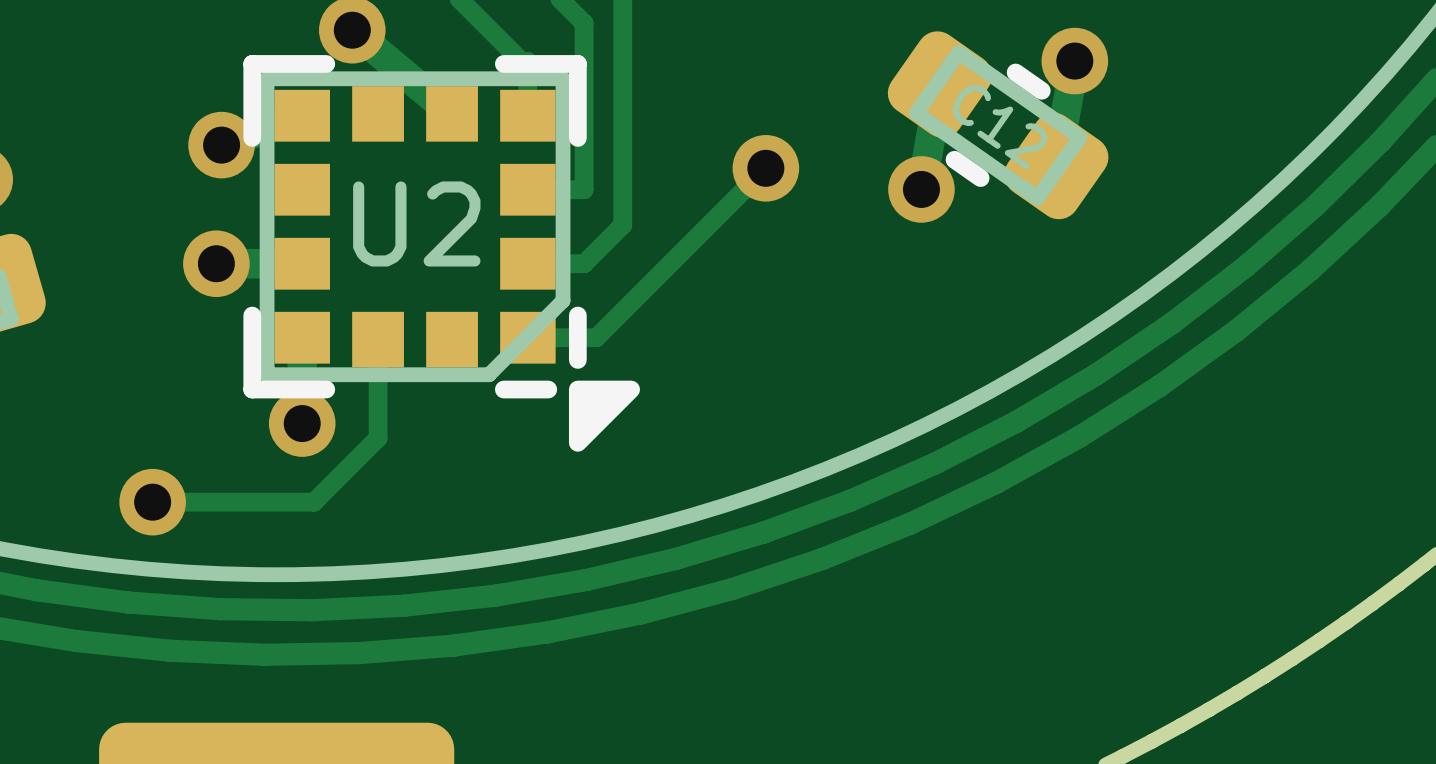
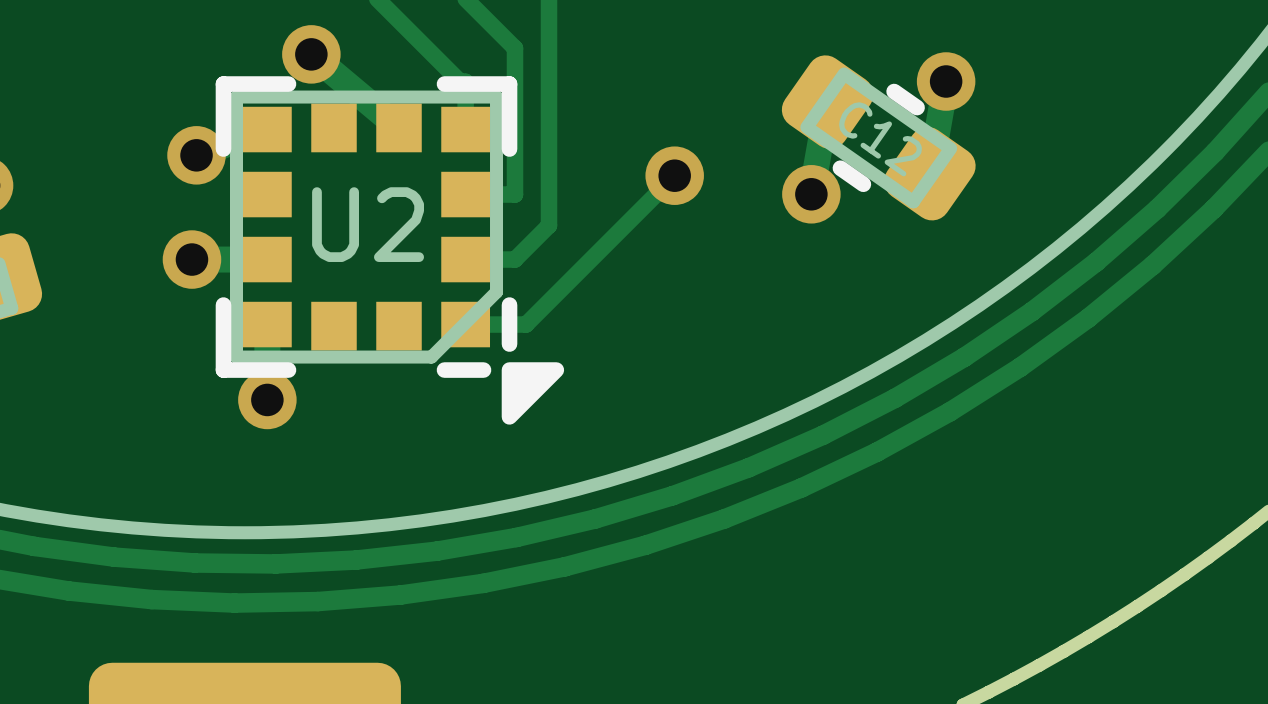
track: (378, 339) (378, 438) (313, 502) (152, 502) -> none
via: (152, 502) -> none

